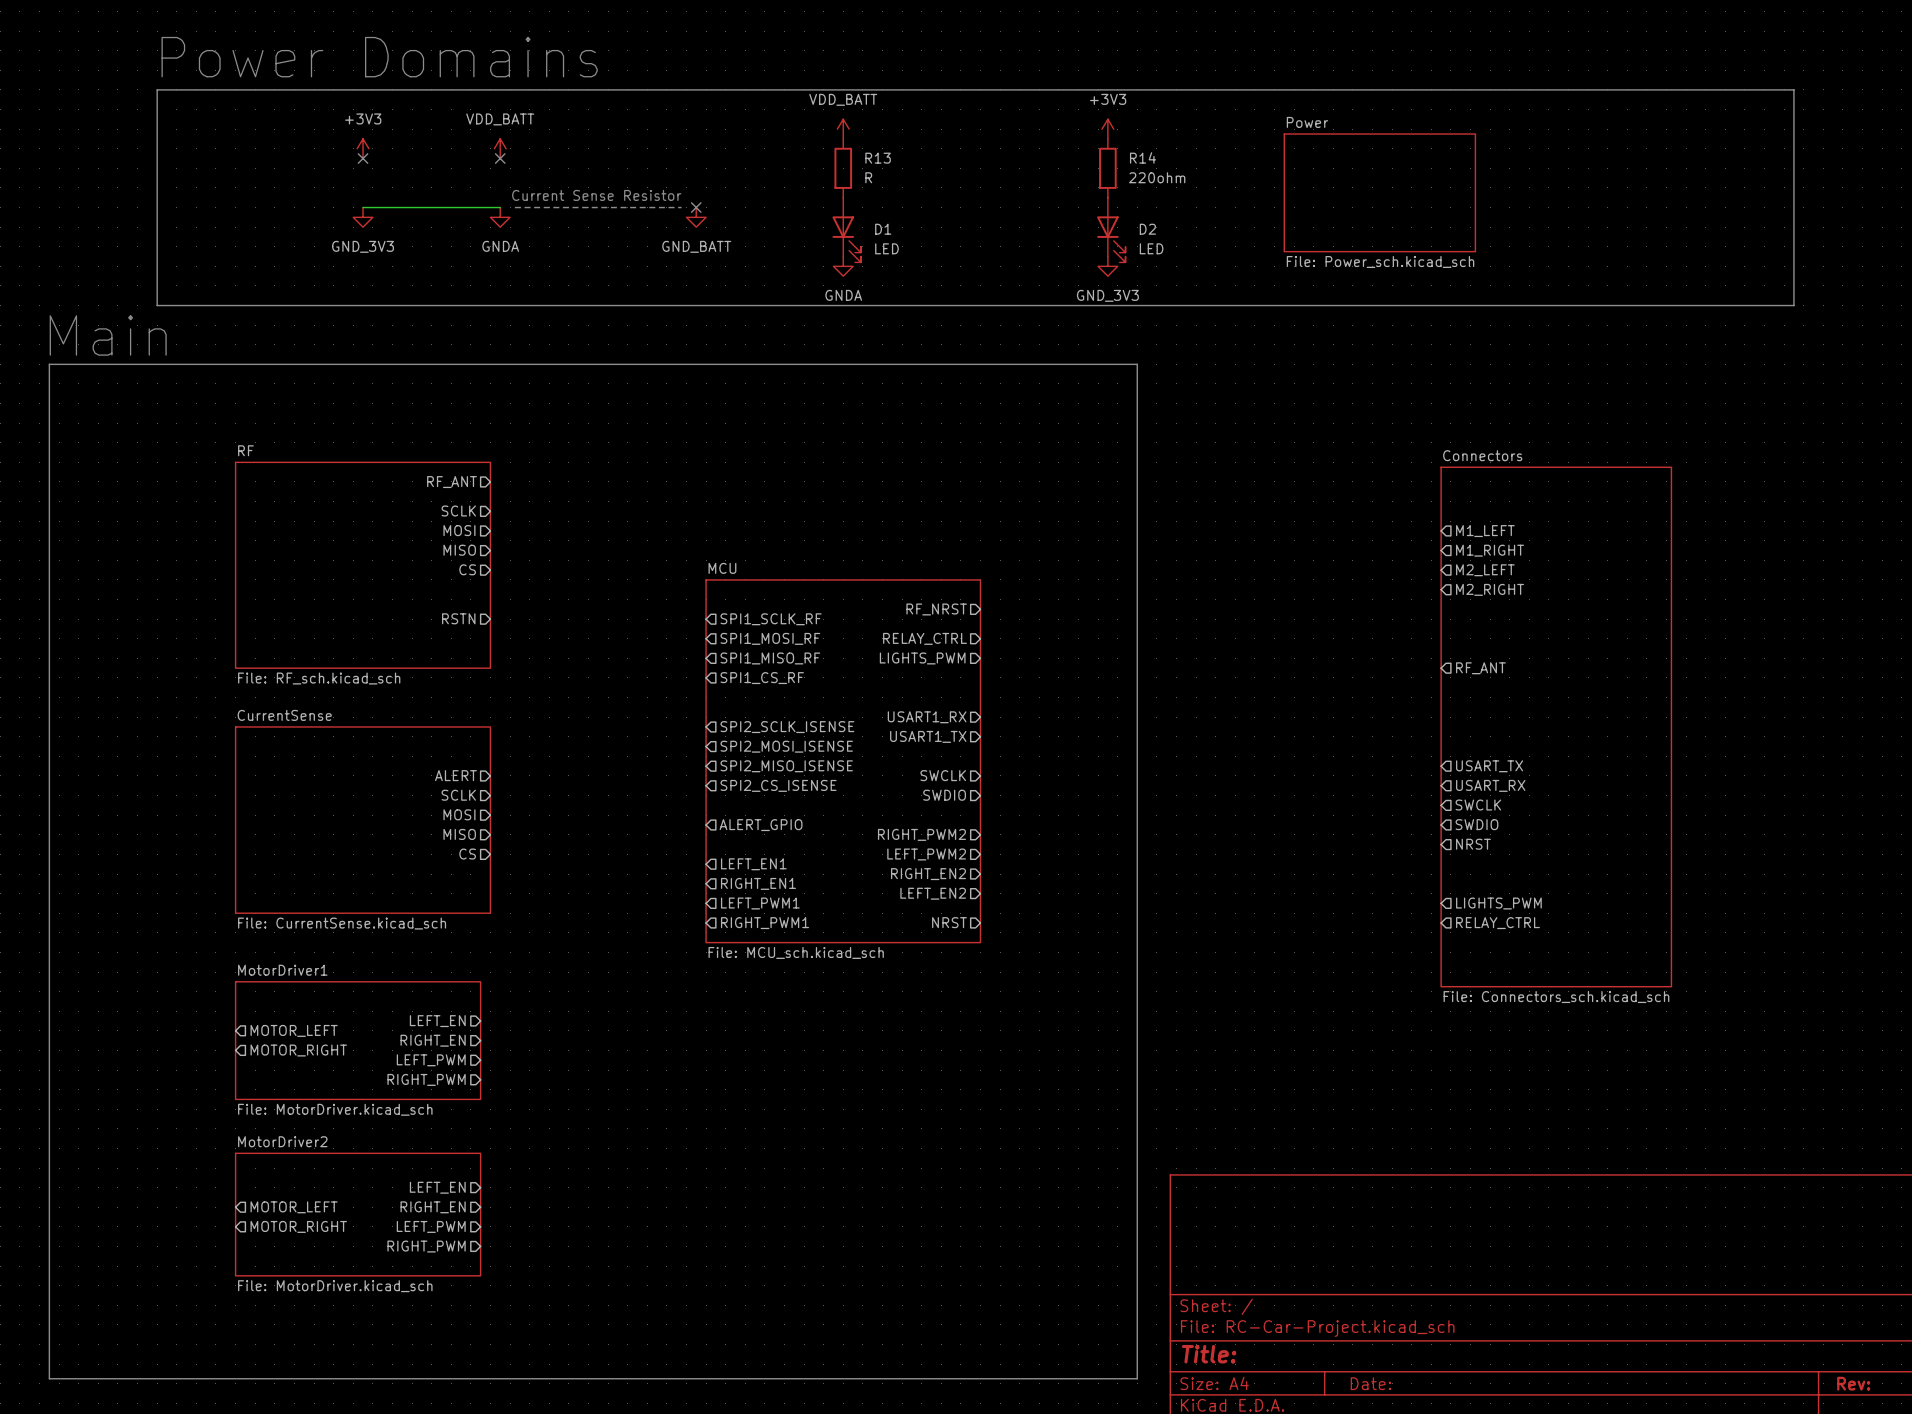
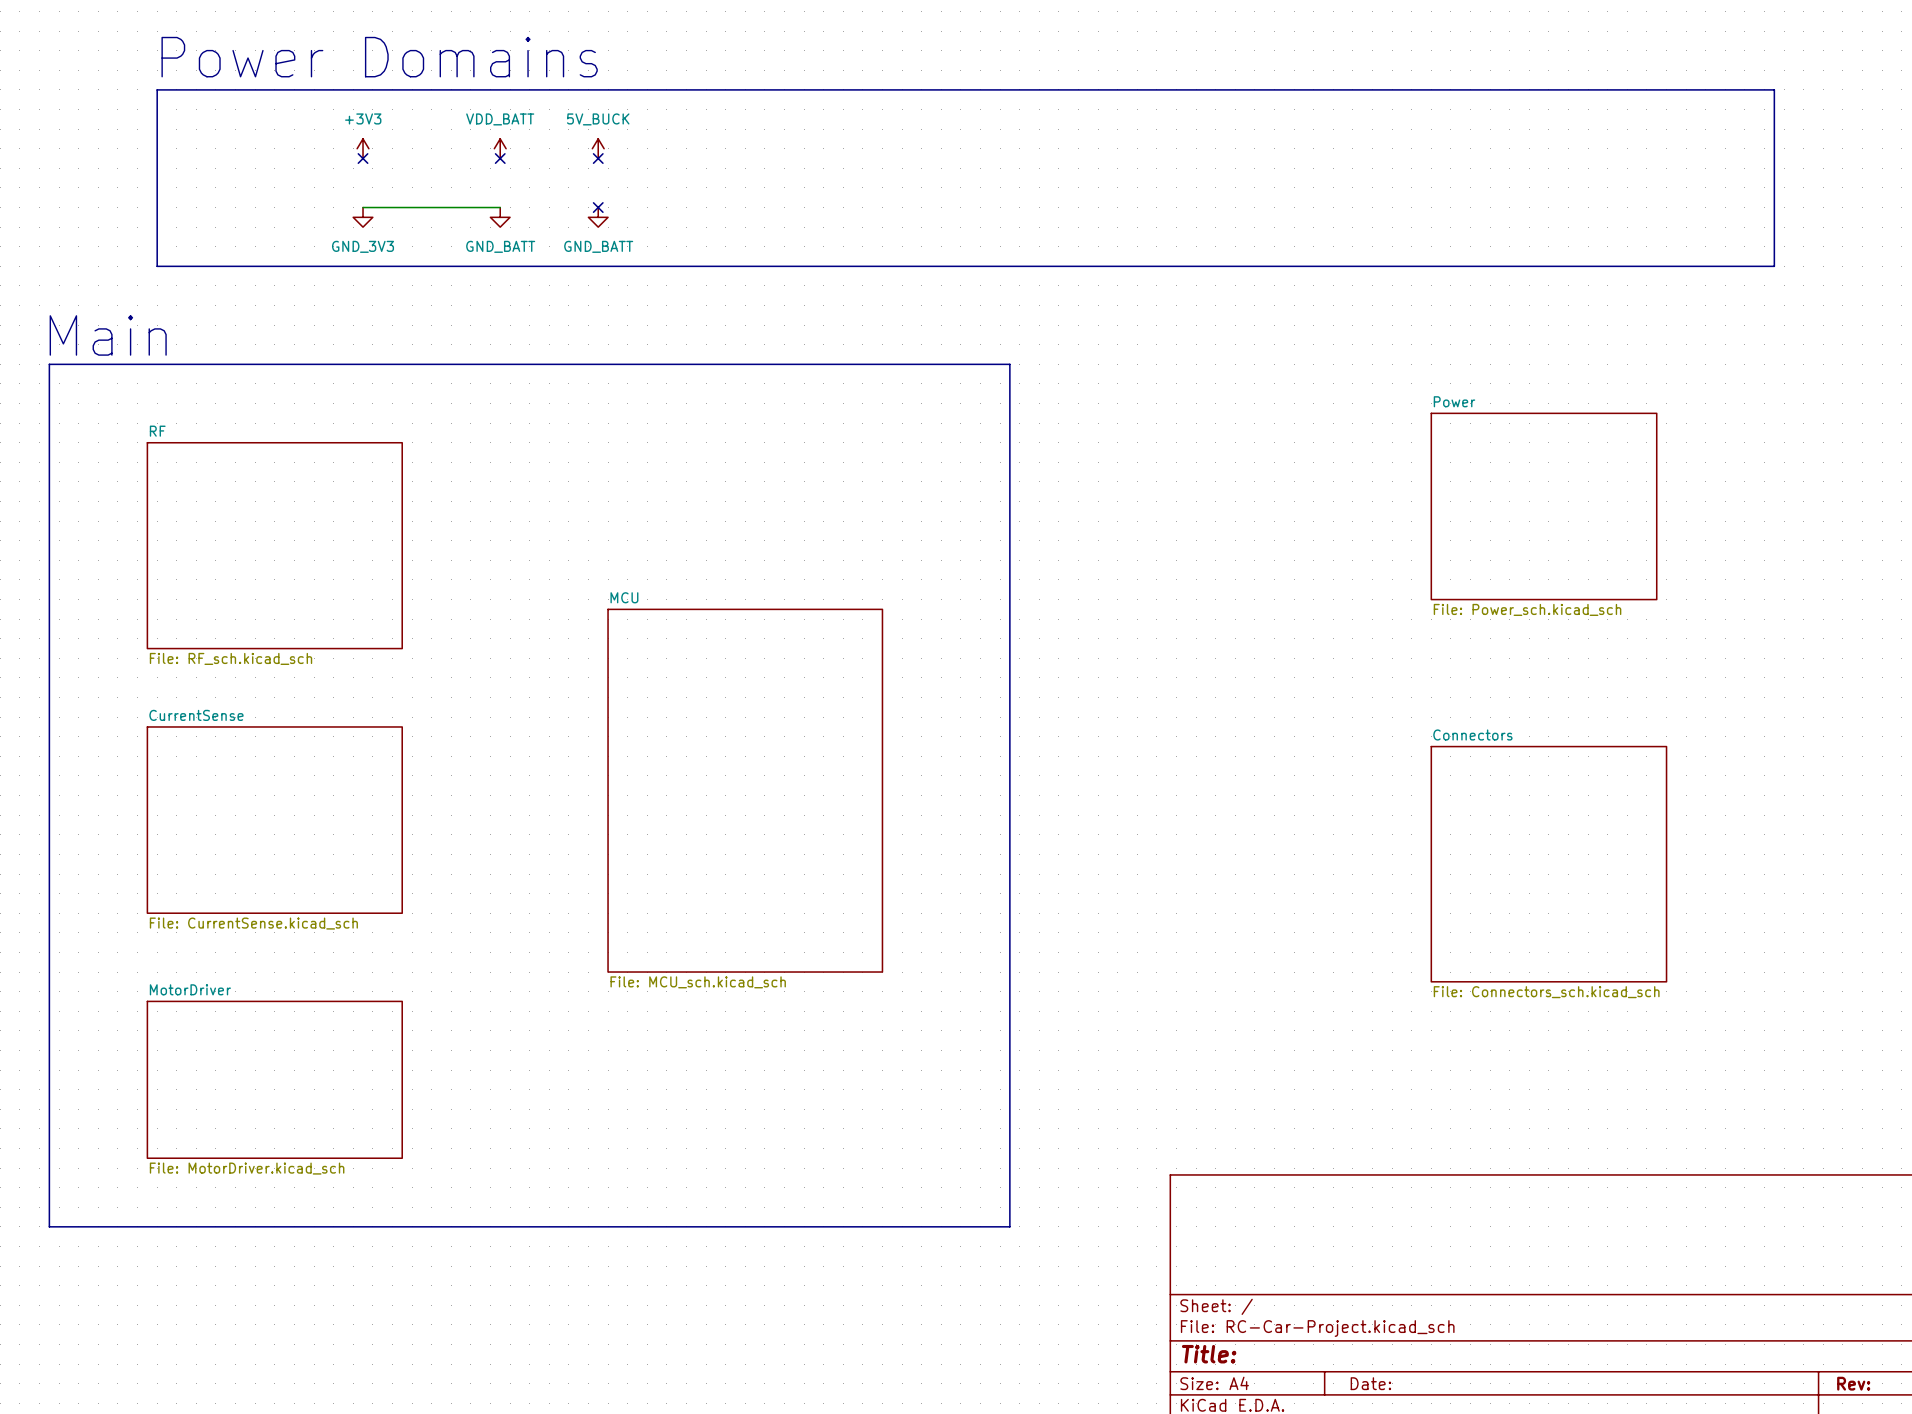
line: (1774, 89) (1793, 89) (1793, 305) (157, 305) (157, 266) -> (1774, 89) (1774, 266) (157, 266)
power symbol: VDD_BATT (843, 129) -> none
power symbol: +3V3 (1107, 129) -> none
power symbol: none -> 5V_BUCK (598, 148)
no-connect mark: none -> (598, 158)
R13: R (843, 168) -> none
R14: 220ohm (1107, 168) -> none
sheet Power: File: Power_sch.kicad_sch (1379, 192) -> none
text: Current Sense Resistor (596, 195) -> none
line: (514, 207) (681, 207) -> none
no-connect mark: none -> (598, 207)
no-connect mark: (696, 207) -> none
power symbol: GNDA (500, 217) -> GND_BATT (500, 217)
power symbol position: GND_BATT (696, 217) -> GND_BATT (598, 217)
D1: LED (846, 230) -> none
D2: LED (1111, 230) -> none
power symbol: GNDA (843, 266) -> none
power symbol: GND_3V3 (1107, 266) -> none
line: (1009, 364) (1137, 364) (1137, 1378) (49, 1378) (49, 1226) -> (1009, 364) (1009, 1226) (49, 1226)
hierarchical label: RF_ANT (451, 482) -> none
sheet Power: none -> File: Power_sch.kicad_sch (1544, 506)
hierarchical label: SCLK (458, 510) -> none
hierarchical label: MOSI (459, 530) -> none
hierarchical label: M1_LEFT (1485, 531) -> none
hierarchical label: MISO (459, 550) -> none
hierarchical label: M1_RIGHT (1490, 550) -> none
sheet RF position: (363, 565) -> (274, 545)
hierarchical label: CS (467, 569) -> none
hierarchical label: M2_LEFT (1485, 570) -> none
hierarchical label: M2_RIGHT (1490, 589) -> none
hierarchical label: RF_NRST (936, 609) -> none
hierarchical label: RSTN (458, 618) -> none
hierarchical label: SPI1_SCLK_RF (771, 619) -> none
hierarchical label: SPI1_MOSI_RF (770, 638) -> none
hierarchical label: RELAY_CTRL (925, 638) -> none
hierarchical label: SPI1_MISO_RF (770, 658) -> none
hierarchical label: LIGHTS_PWM (922, 658) -> none
hierarchical label: RF_ANT (1480, 668) -> none
hierarchical label: SPI1_CS_RF (762, 678) -> none
hierarchical label: USART1_RX (927, 717) -> none
sheet Connectors: File: Connectors_sch.kicad_sch (1556, 726) -> none
hierarchical label: SPI2_SCLK_ISENSE (787, 727) -> none
hierarchical label: USART1_TX (928, 736) -> none
hierarchical label: SPI2_MOSI_ISENSE (786, 746) -> none
sheet MCU position: (843, 761) -> (745, 790)
hierarchical label: SPI2_MISO_ISENSE (786, 766) -> none
hierarchical label: USART_TX (1489, 766) -> none
hierarchical label: ALERT (455, 775) -> none
hierarchical label: SWCLK (943, 775) -> none
hierarchical label: SPI2_CS_ISENSE (778, 785) -> none
hierarchical label: USART_RX (1490, 785) -> none
hierarchical label: SCLK (458, 795) -> none
hierarchical label: SWDIO (944, 795) -> none
hierarchical label: SWCLK (1478, 805) -> none
hierarchical label: MOSI (459, 814) -> none
sheet CurrentSense position: (363, 820) -> (274, 820)
hierarchical label: SWDIO (1476, 824) -> none
hierarchical label: ALERT_GPIO (761, 825) -> none
hierarchical label: MISO (459, 834) -> none
hierarchical label: RIGHT_PWM2 (921, 834) -> none
hierarchical label: NRST (1473, 844) -> none
hierarchical label: CS (467, 854) -> none
hierarchical label: LEFT_PWM2 (926, 854) -> none
hierarchical label: LEFT_EN1 (753, 864) -> none
sheet Connectors: none -> File: Connectors_sch.kicad_sch (1548, 864)
hierarchical label: RIGHT_EN2 (928, 874) -> none
hierarchical label: RIGHT_EN1 (758, 883) -> none
hierarchical label: LEFT_EN2 (933, 893) -> none
hierarchical label: LEFT_PWM1 (760, 903) -> none
hierarchical label: LIGHTS_PWM (1498, 903) -> none
hierarchical label: NRST (949, 922) -> none
hierarchical label: RIGHT_PWM1 (765, 923) -> none
hierarchical label: RELAY_CTRL (1497, 923) -> none
hierarchical label: LEFT_EN (437, 1021) -> none
hierarchical label: MOTOR_LEFT (294, 1030) -> none
sheet MotorDriver1: File: MotorDriver.kicad_sch (358, 1040) -> none
hierarchical label: RIGHT_EN (433, 1040) -> none
hierarchical label: MOTOR_RIGHT (298, 1050) -> none
hierarchical label: LEFT_PWM (431, 1060) -> none
sheet MotorDriver: none -> File: MotorDriver.kicad_sch (274, 1079)
hierarchical label: RIGHT_PWM (426, 1079) -> none
hierarchical label: LEFT_EN (437, 1187) -> none
hierarchical label: MOTOR_LEFT (294, 1207) -> none
hierarchical label: RIGHT_EN (433, 1207) -> none
sheet MotorDriver2: File: MotorDriver.kicad_sch (358, 1214) -> none
hierarchical label: MOTOR_RIGHT (298, 1226) -> none
hierarchical label: LEFT_PWM (431, 1226) -> none
hierarchical label: RIGHT_PWM (426, 1246) -> none

